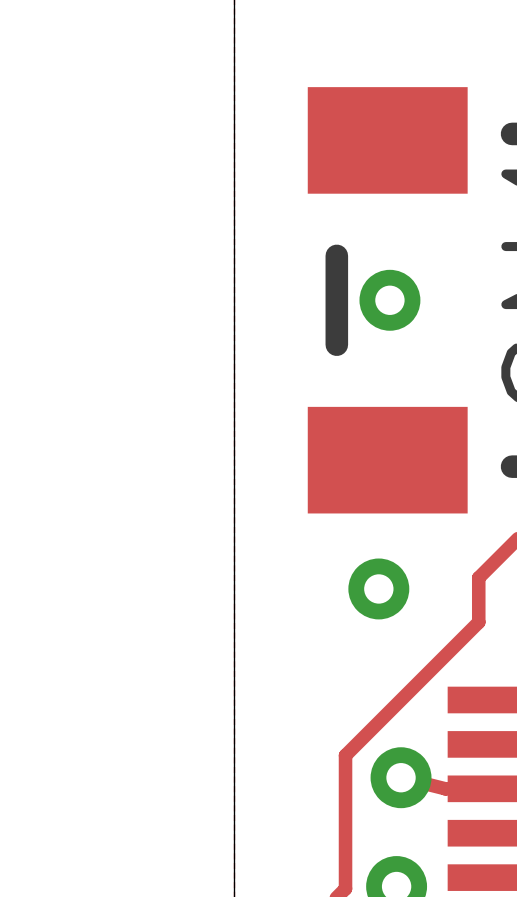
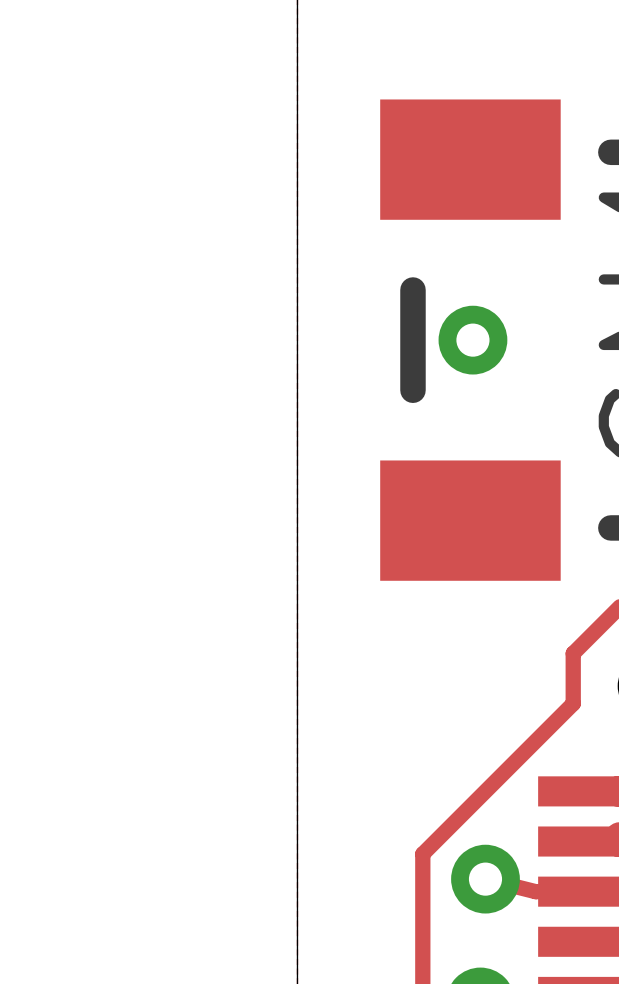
via: (378, 588) -> none

